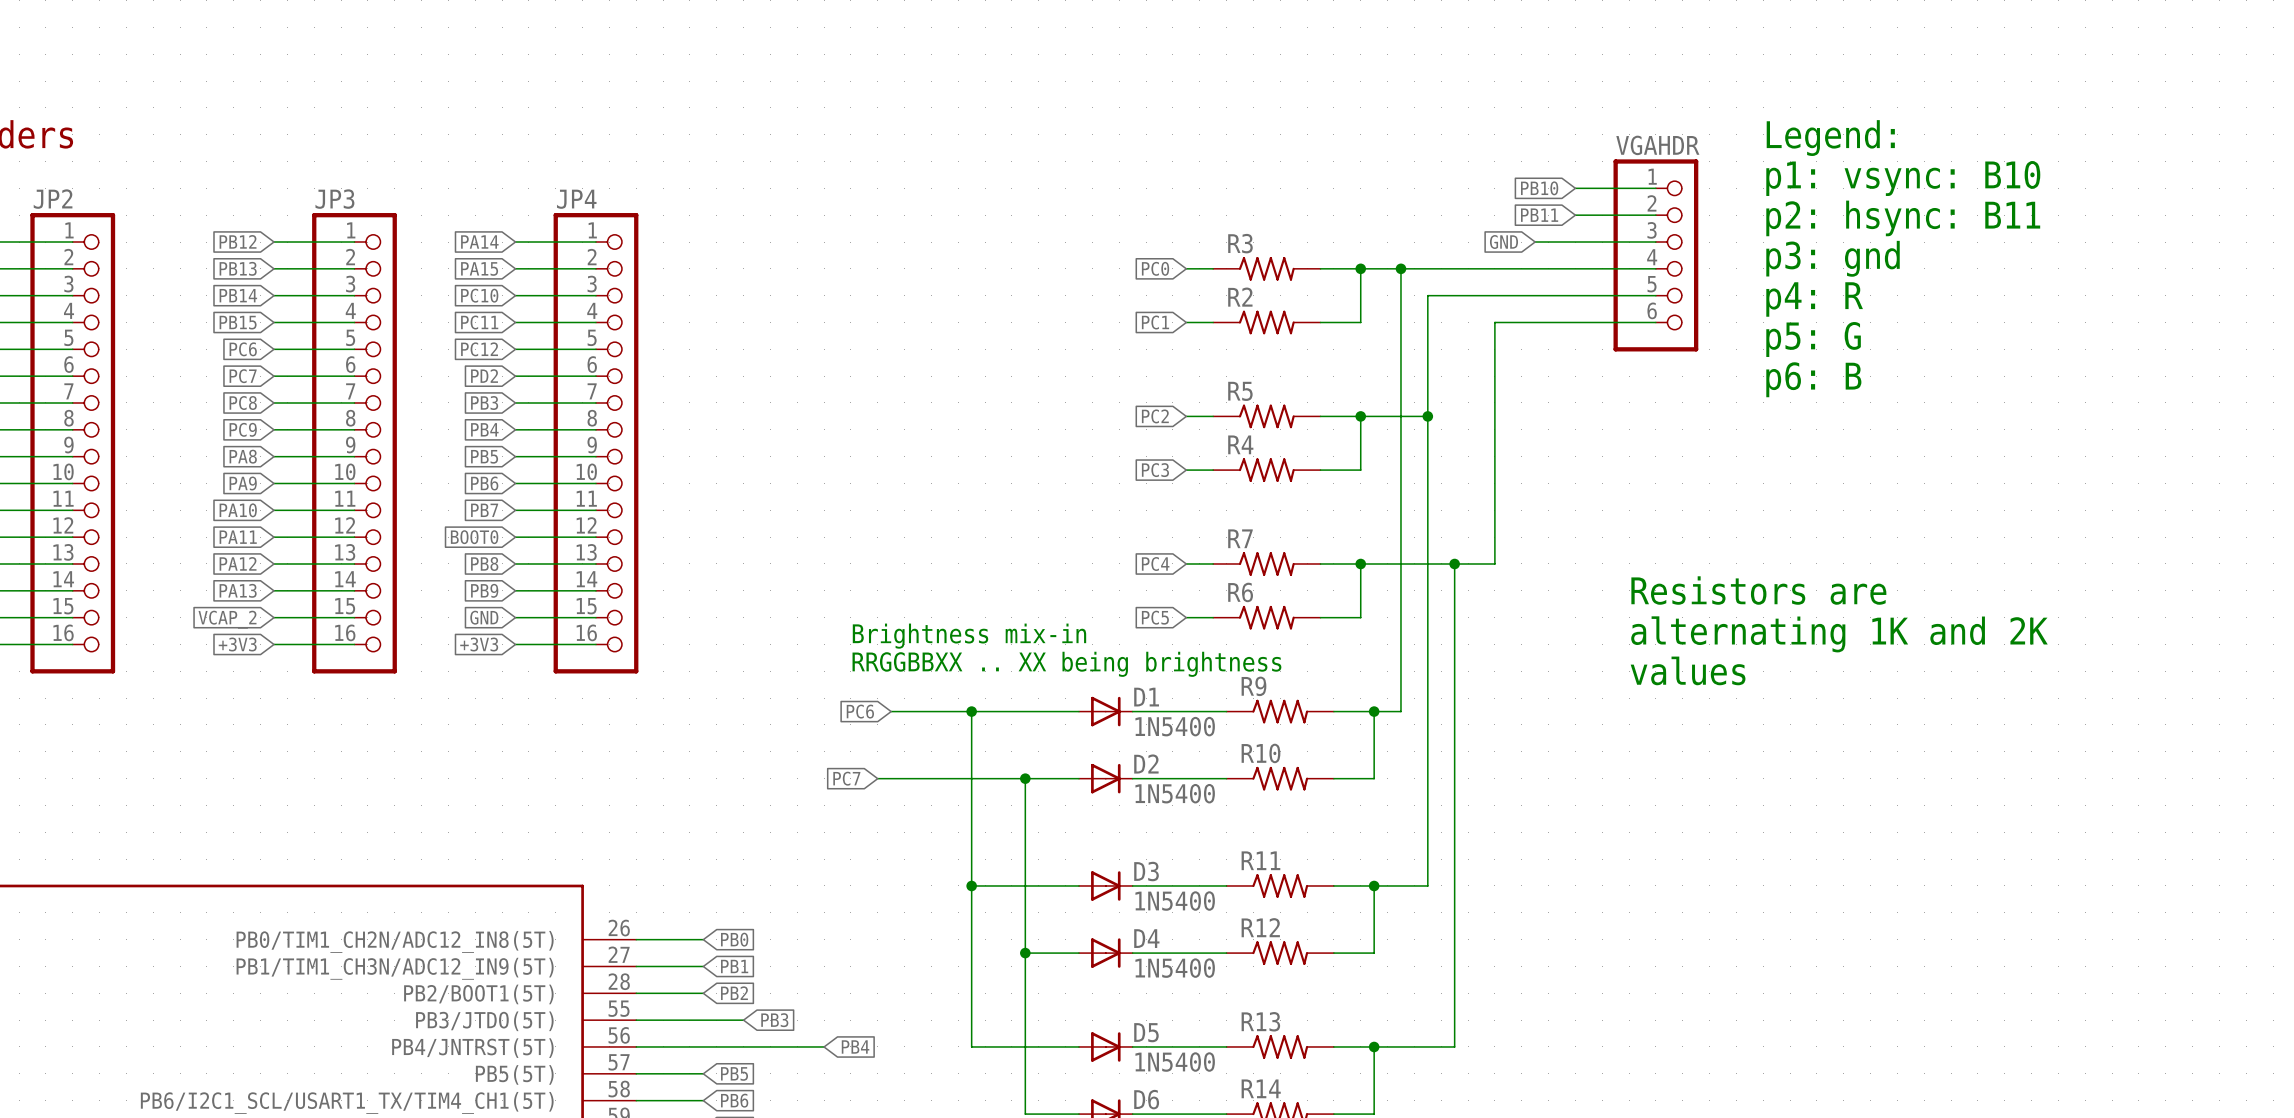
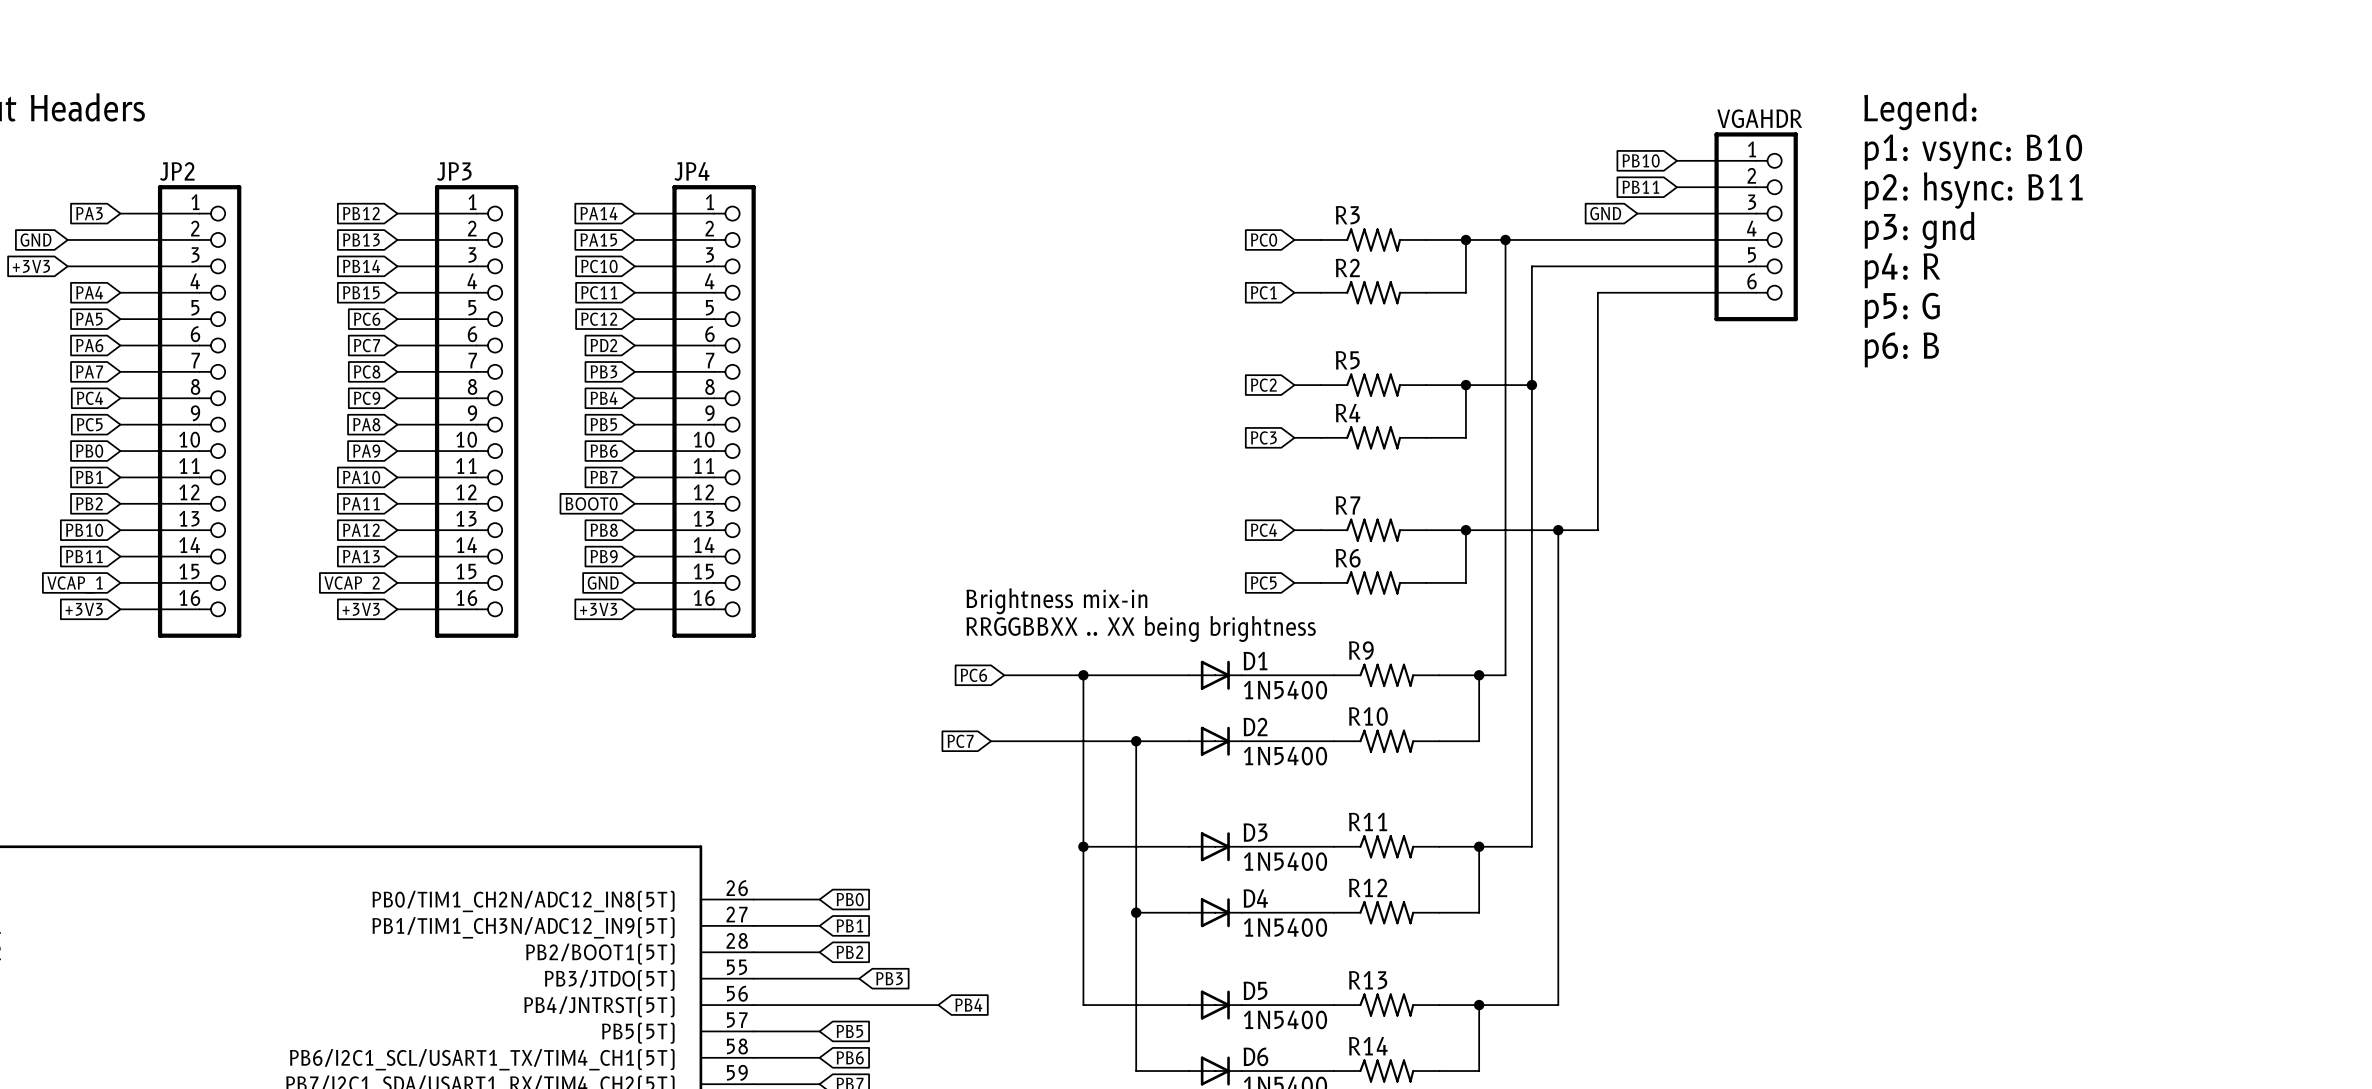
text: Resistors are (1758, 590) -> none
text: alternating 1K and 2K (1839, 634) -> none
text: values (1688, 670) -> none

